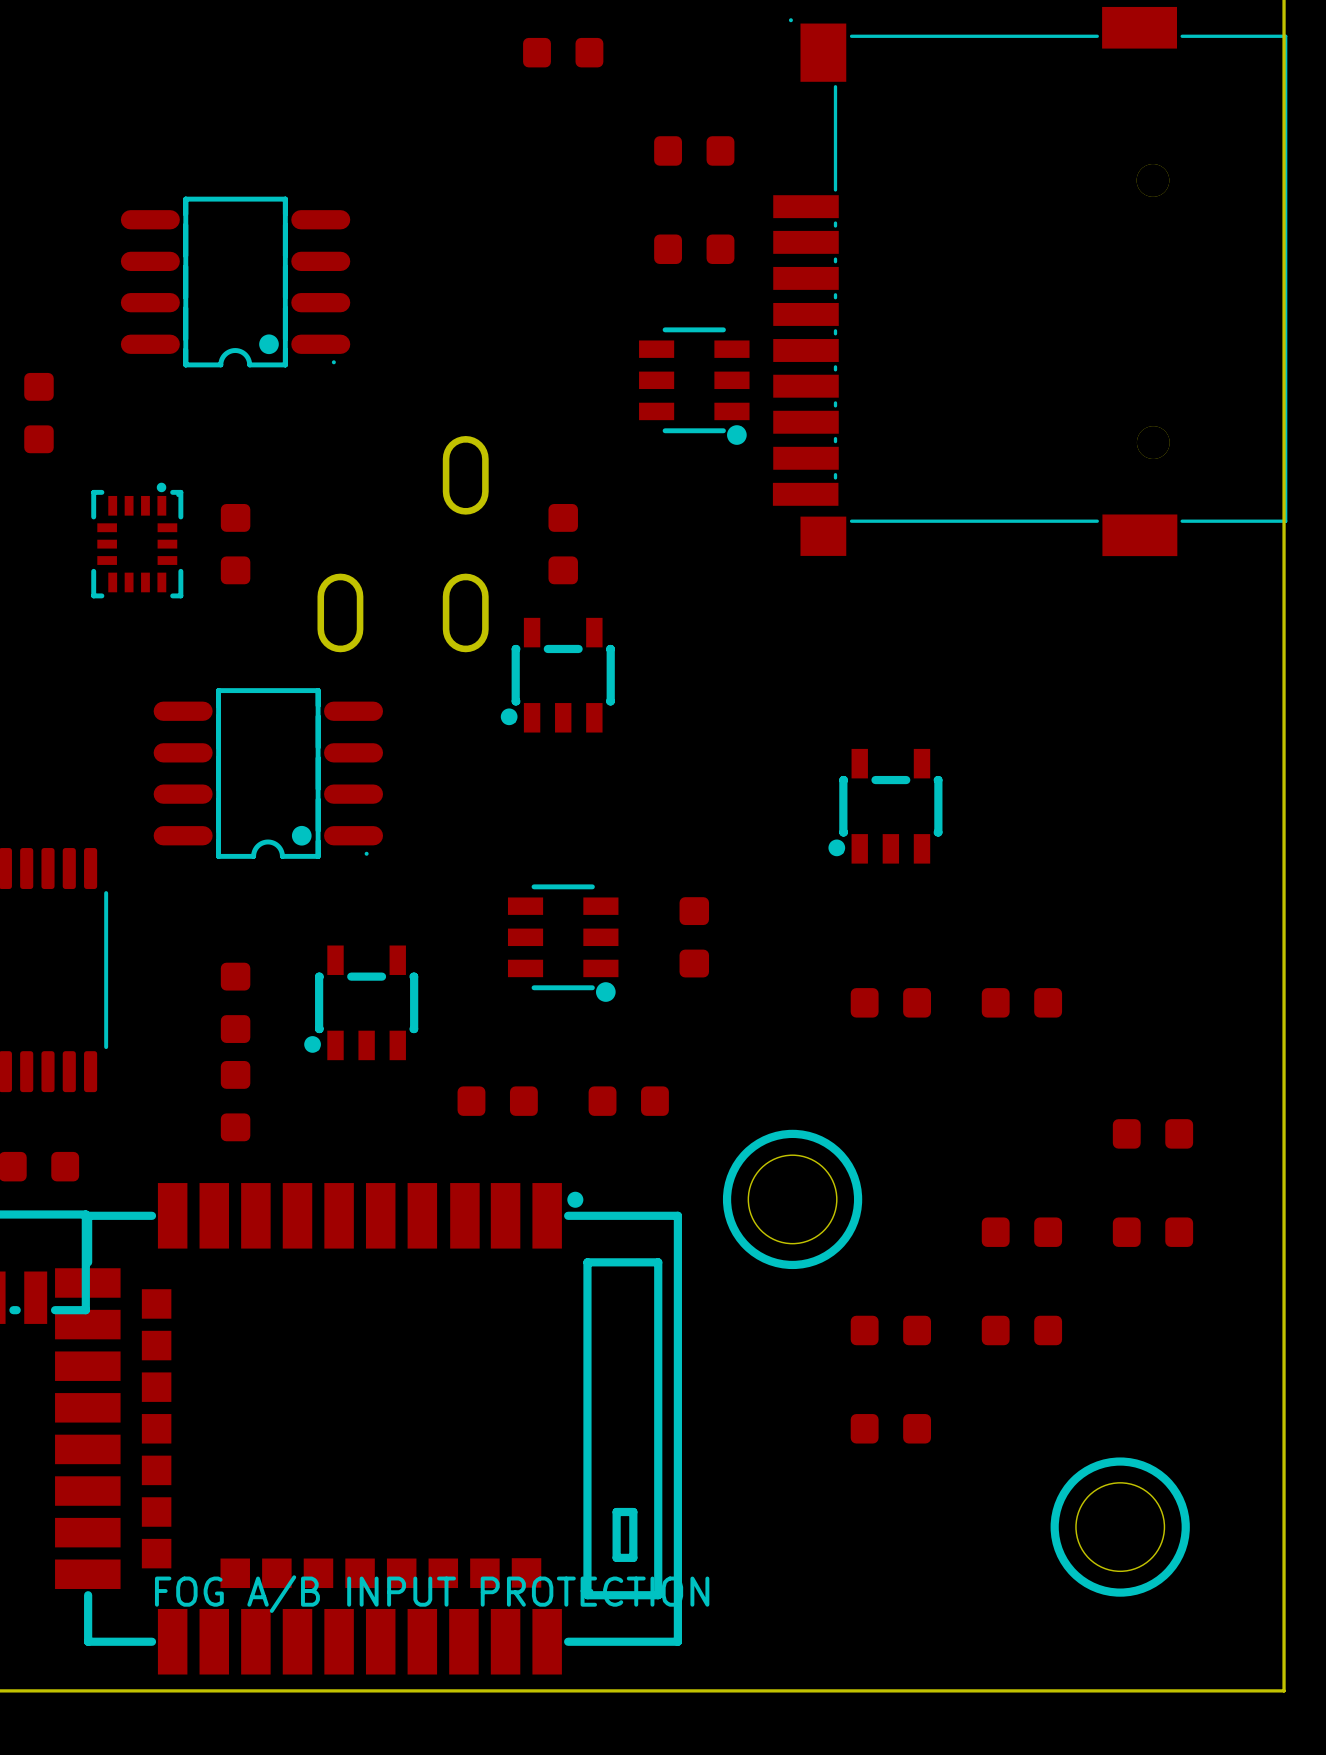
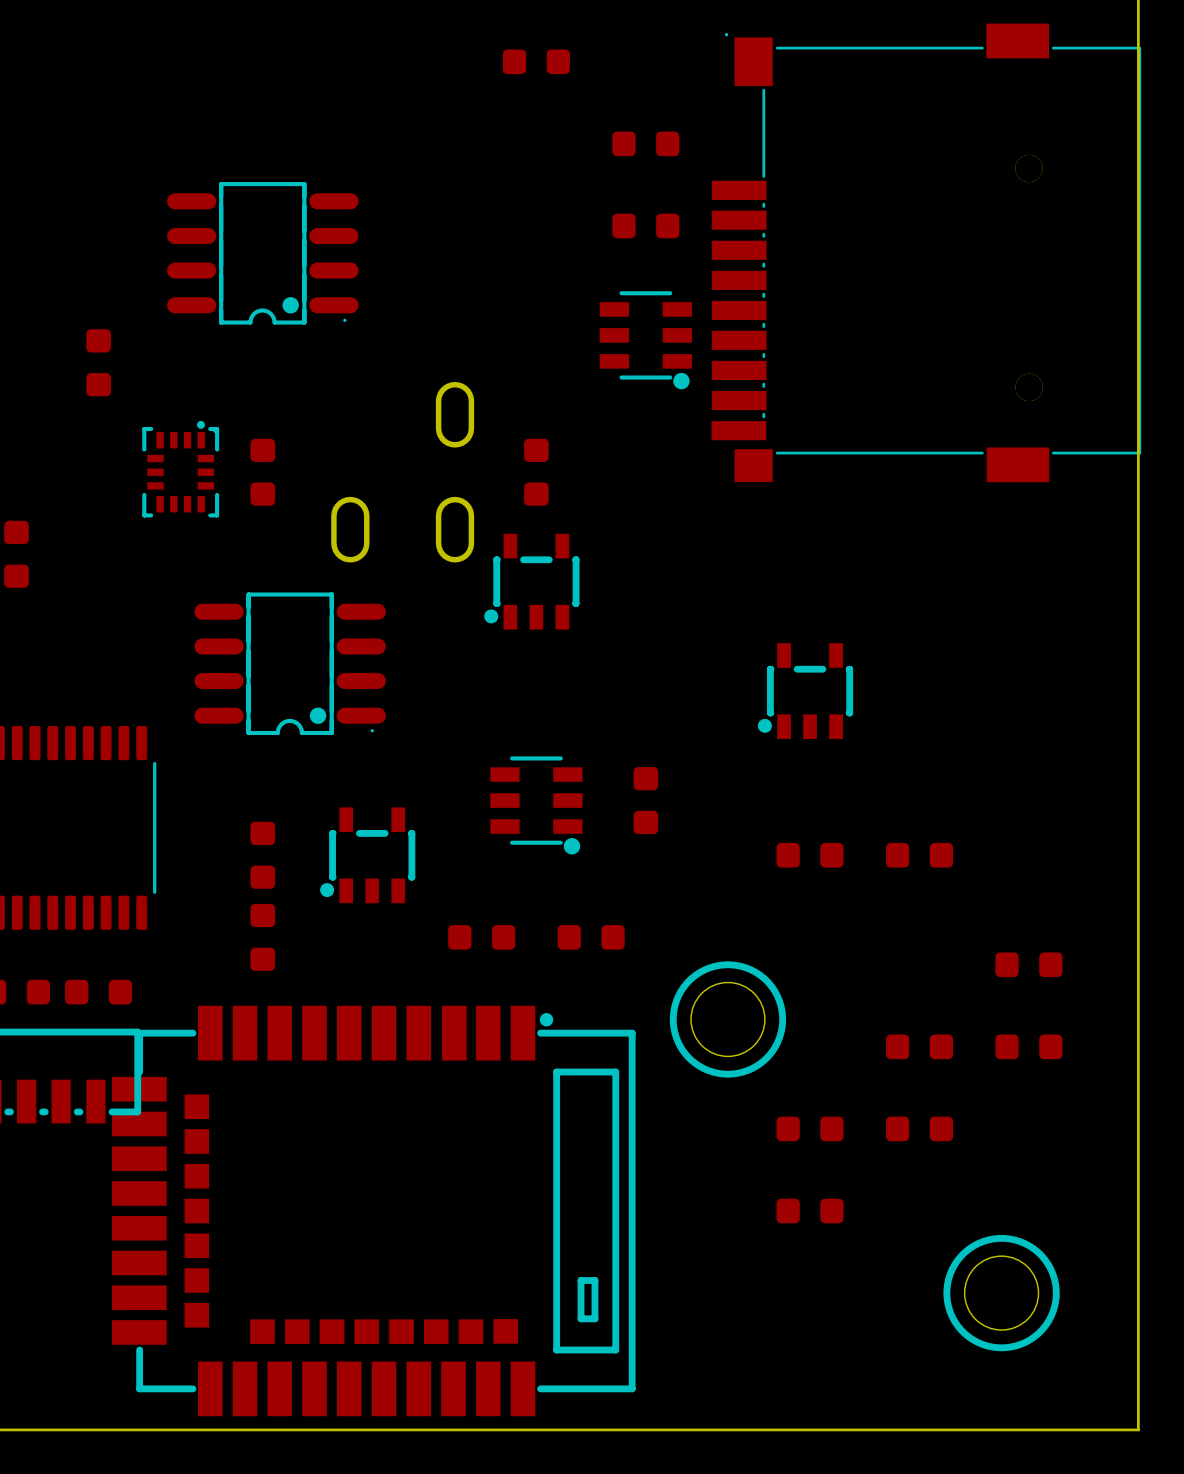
text: FOG A/B INPUT PROTECTION (432, 1594) -> none

